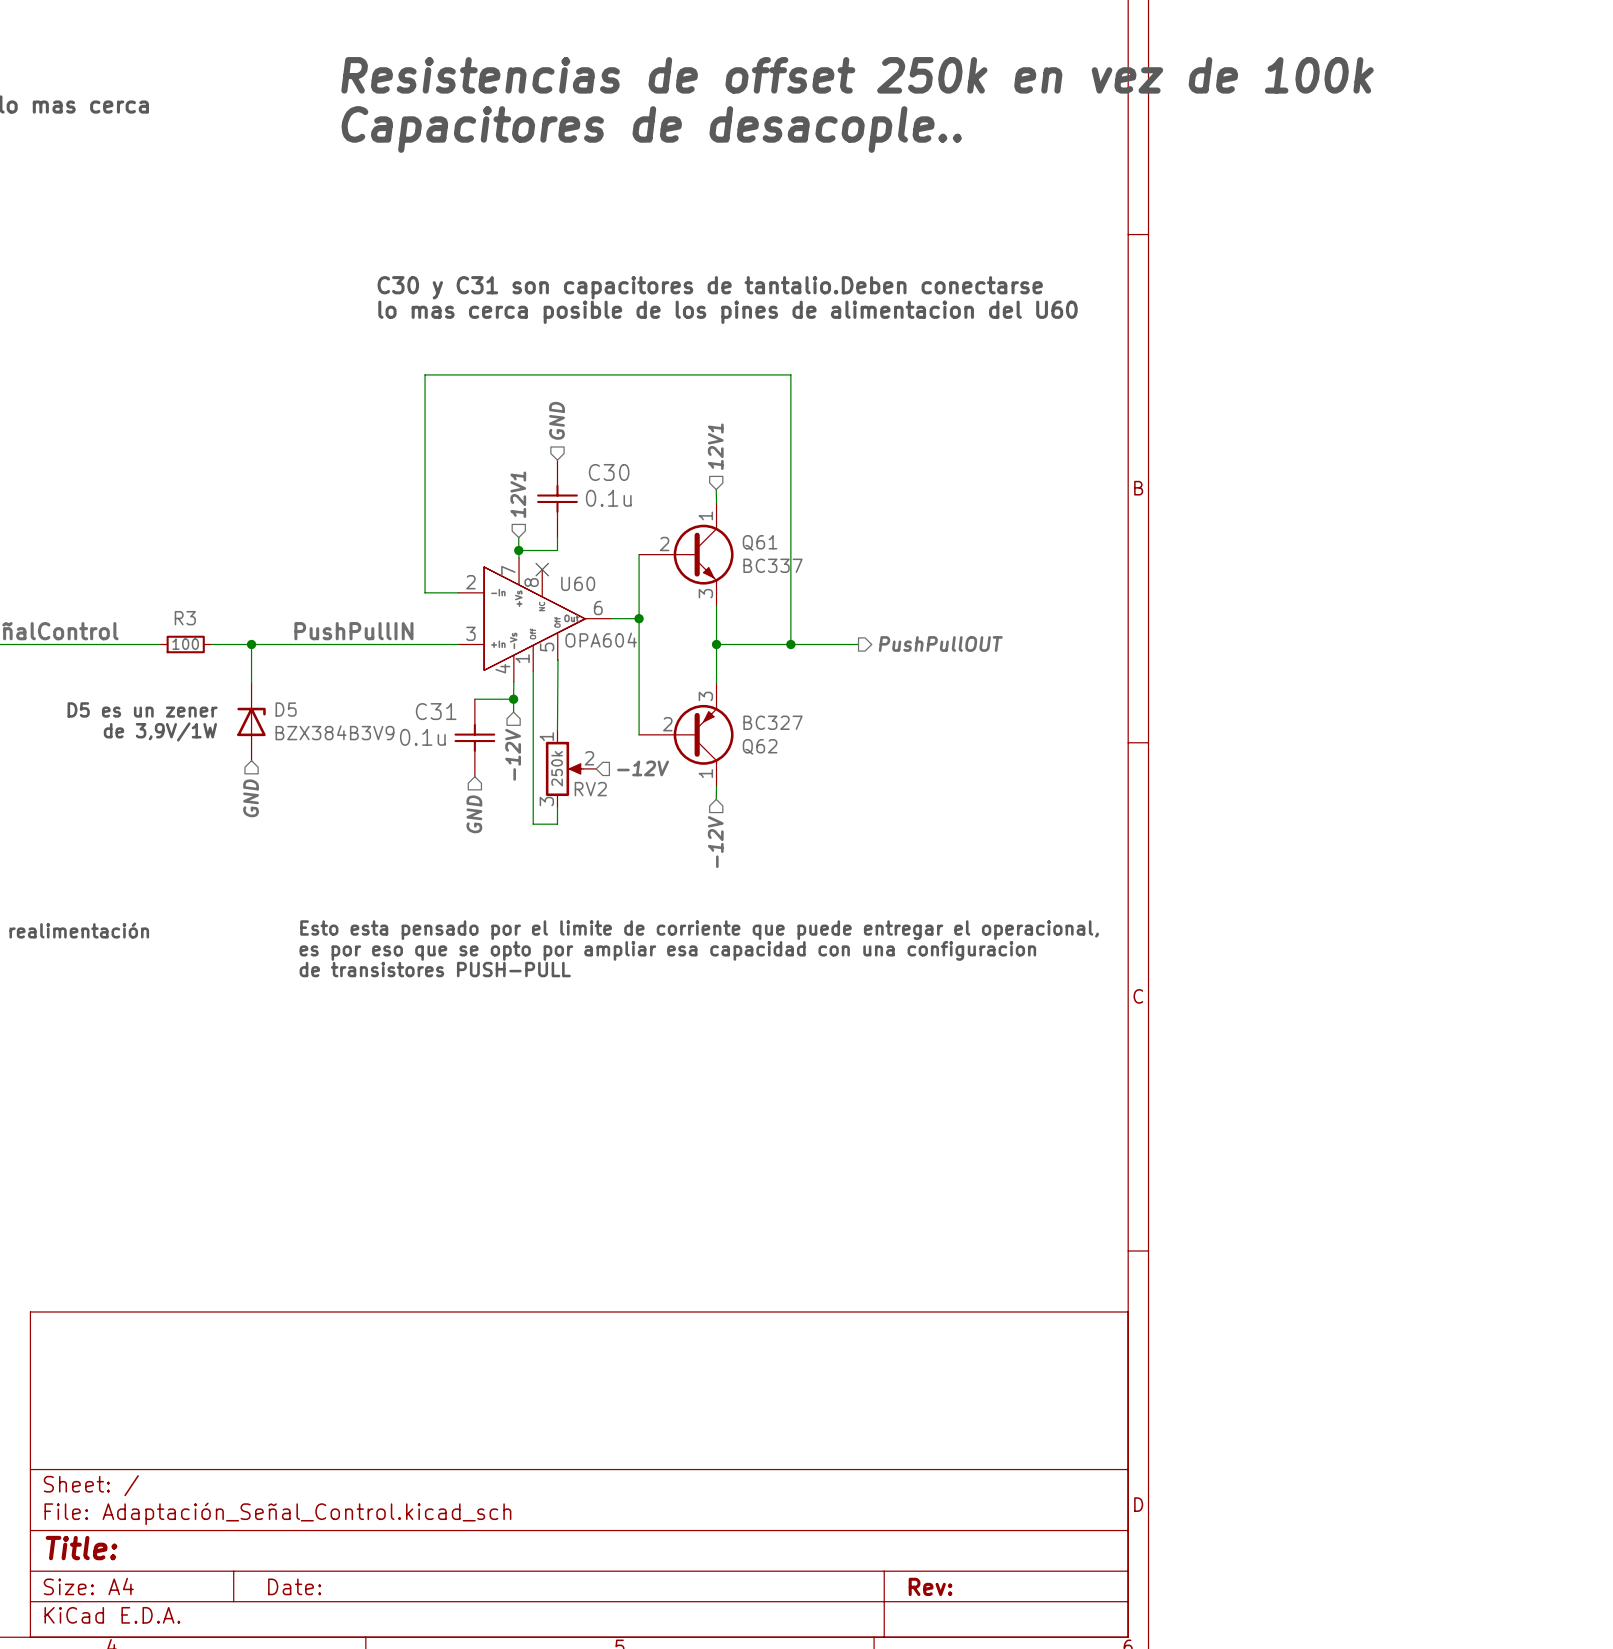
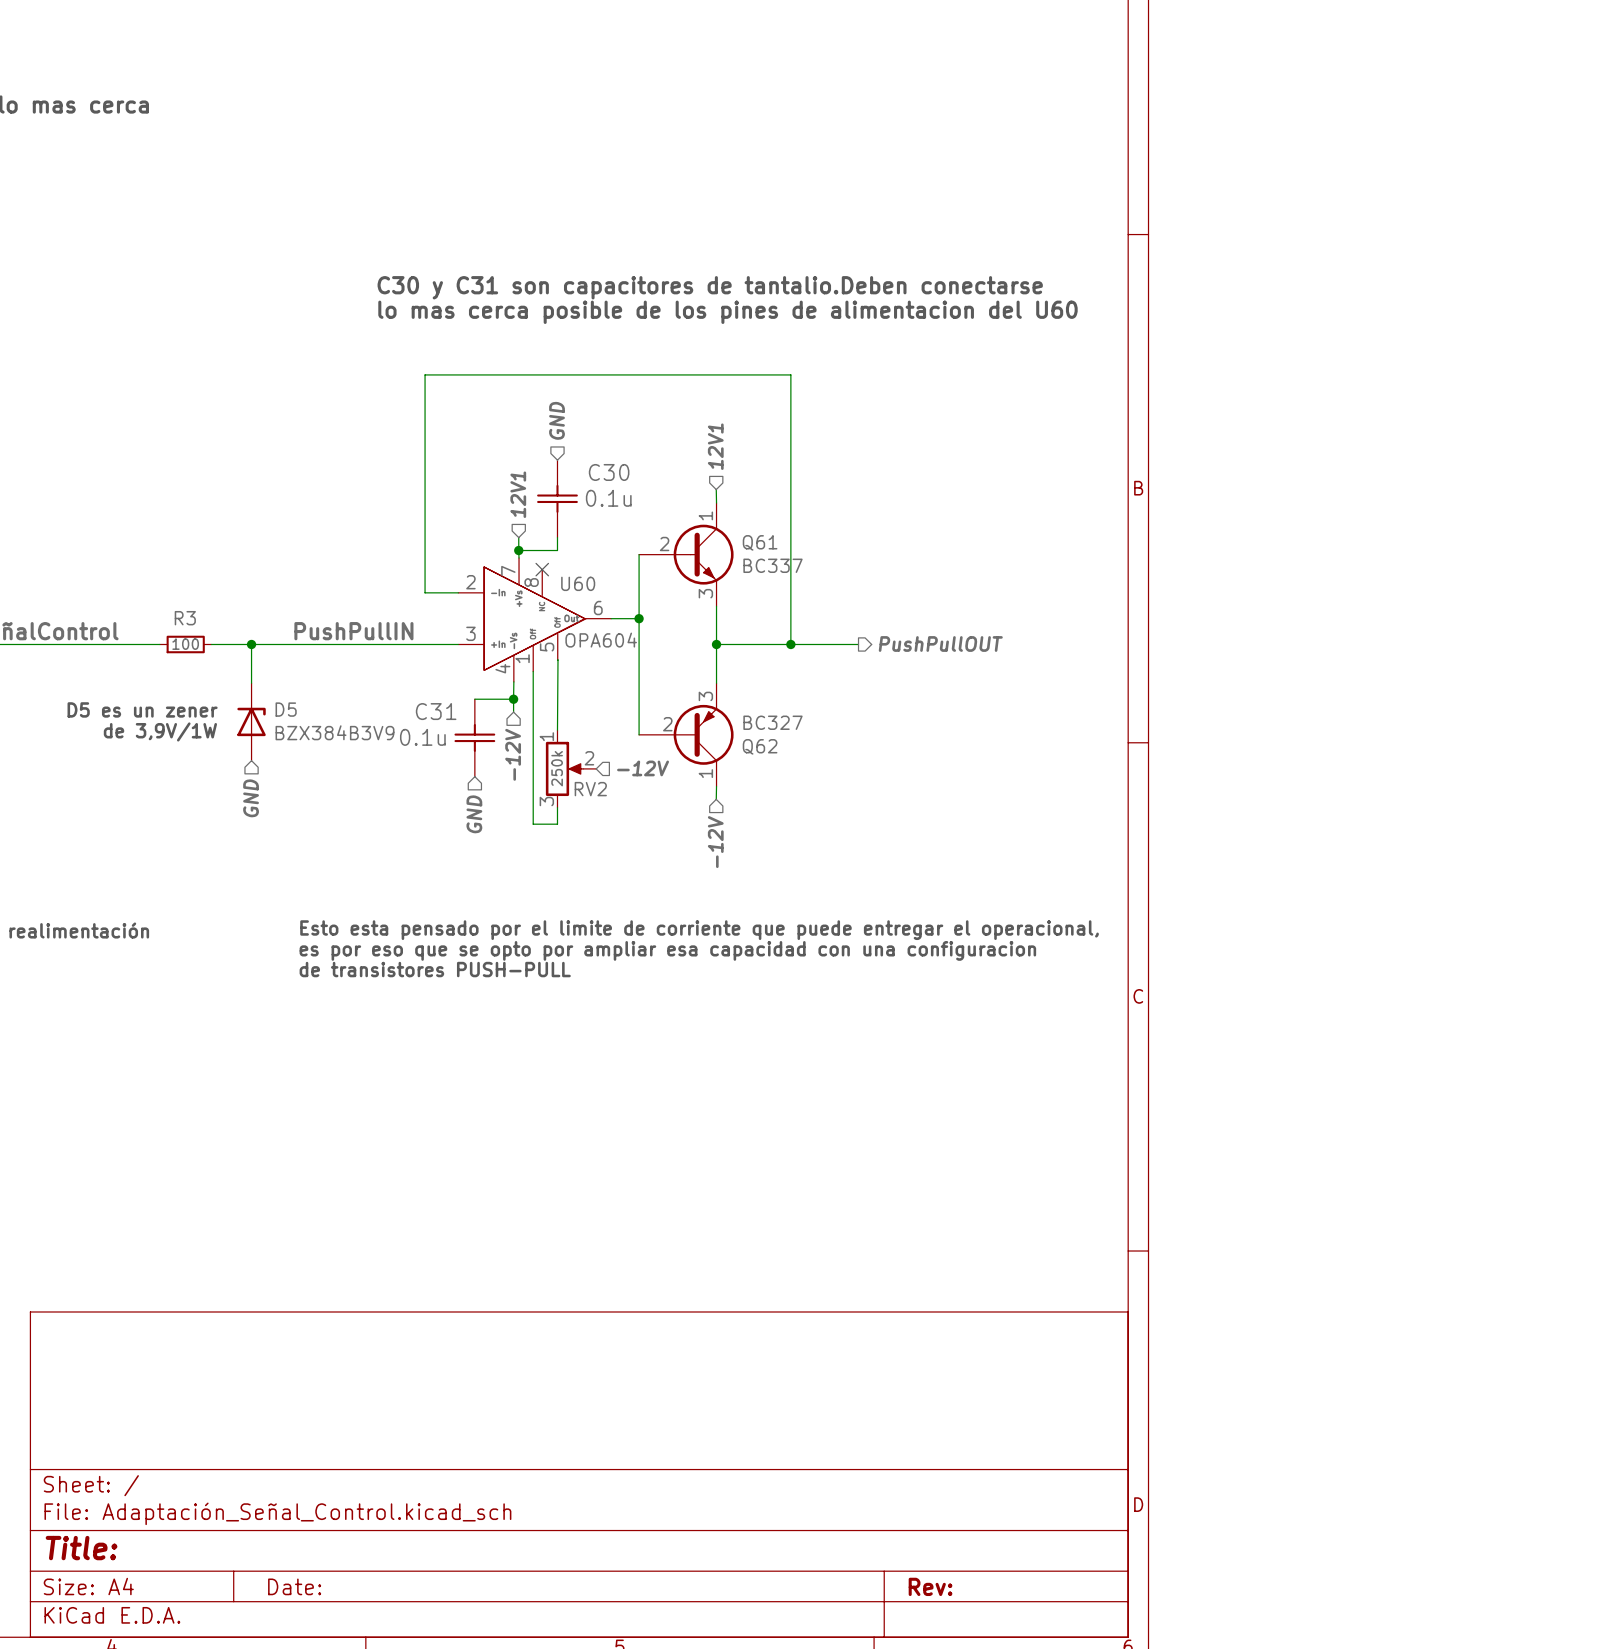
text: Resistencias de offset 250k en vez de 100k (857, 75) -> none
text: Capacitores de desacople.. (651, 129) -> none

